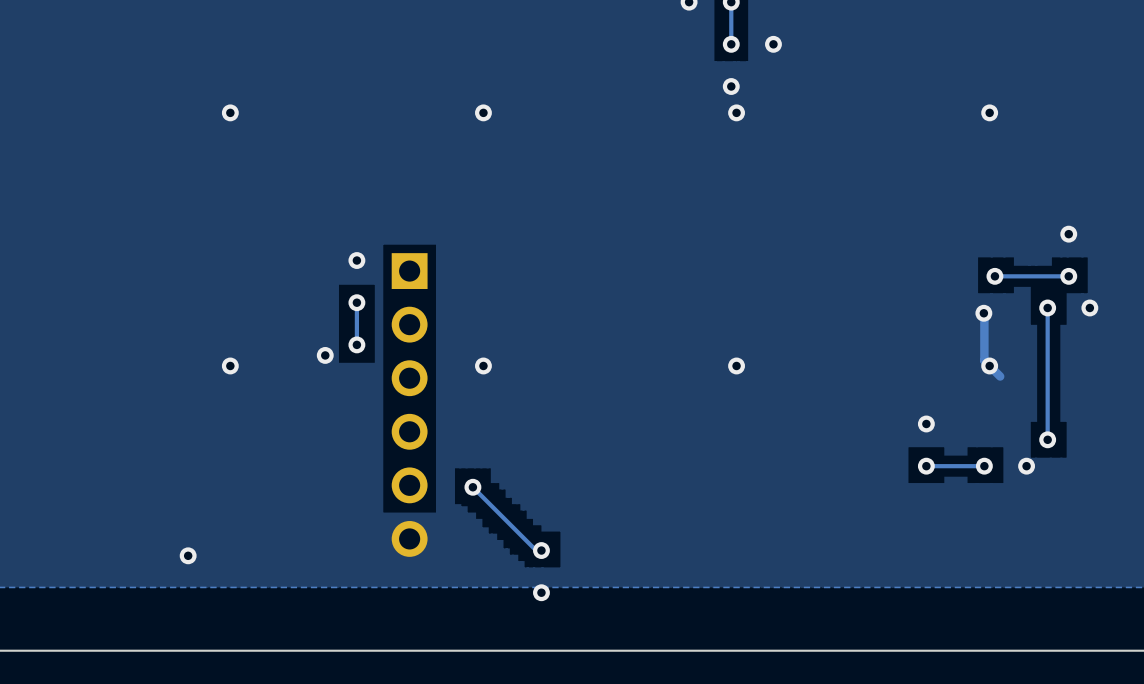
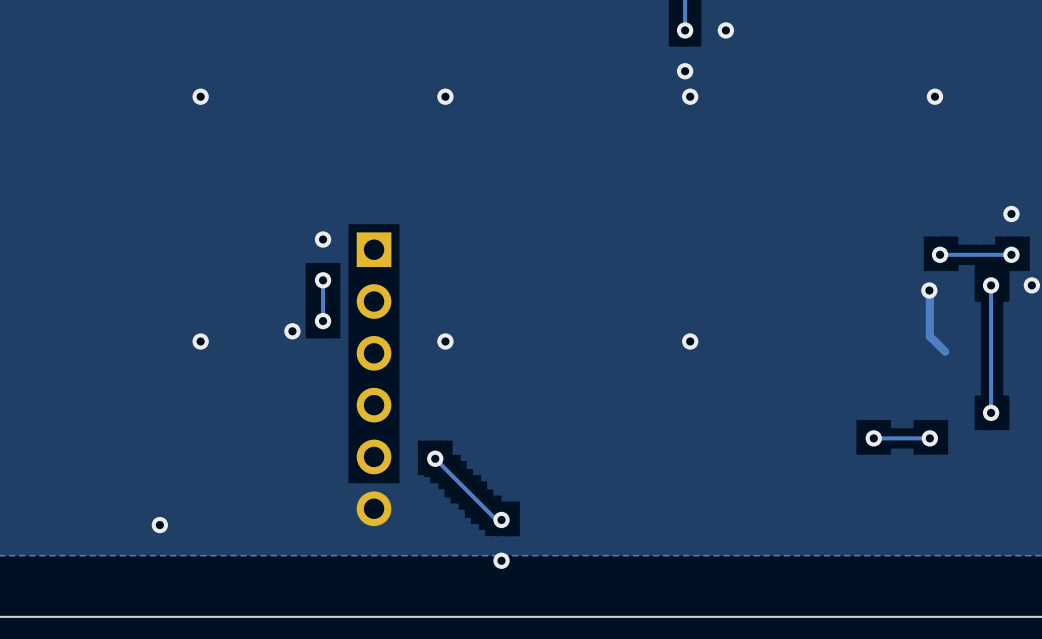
via: (989, 365) -> none
via: (926, 423) -> none
via: (1026, 466) -> none

